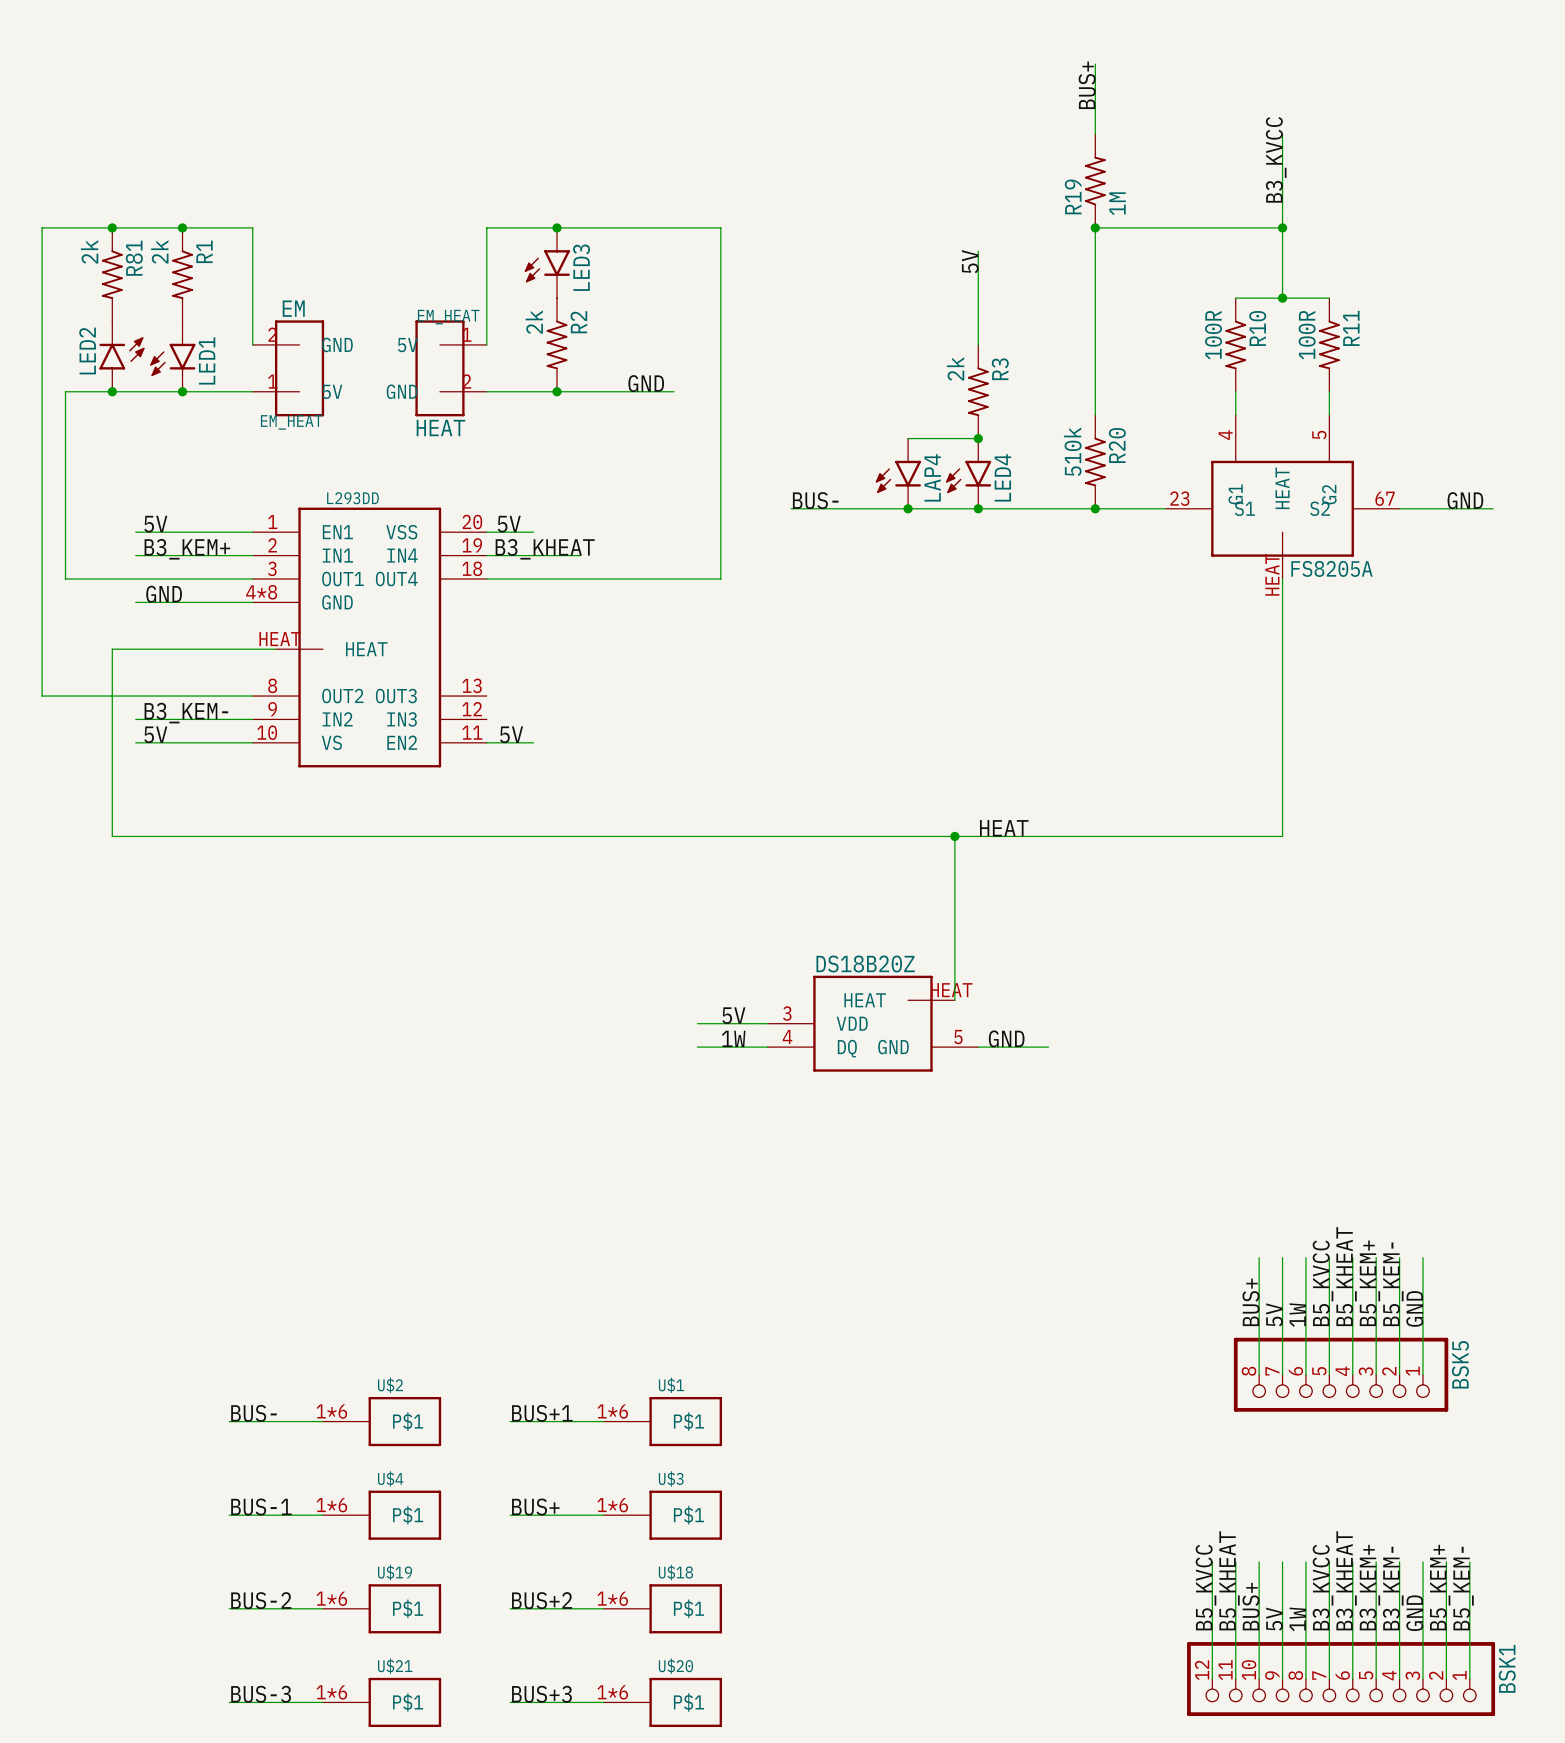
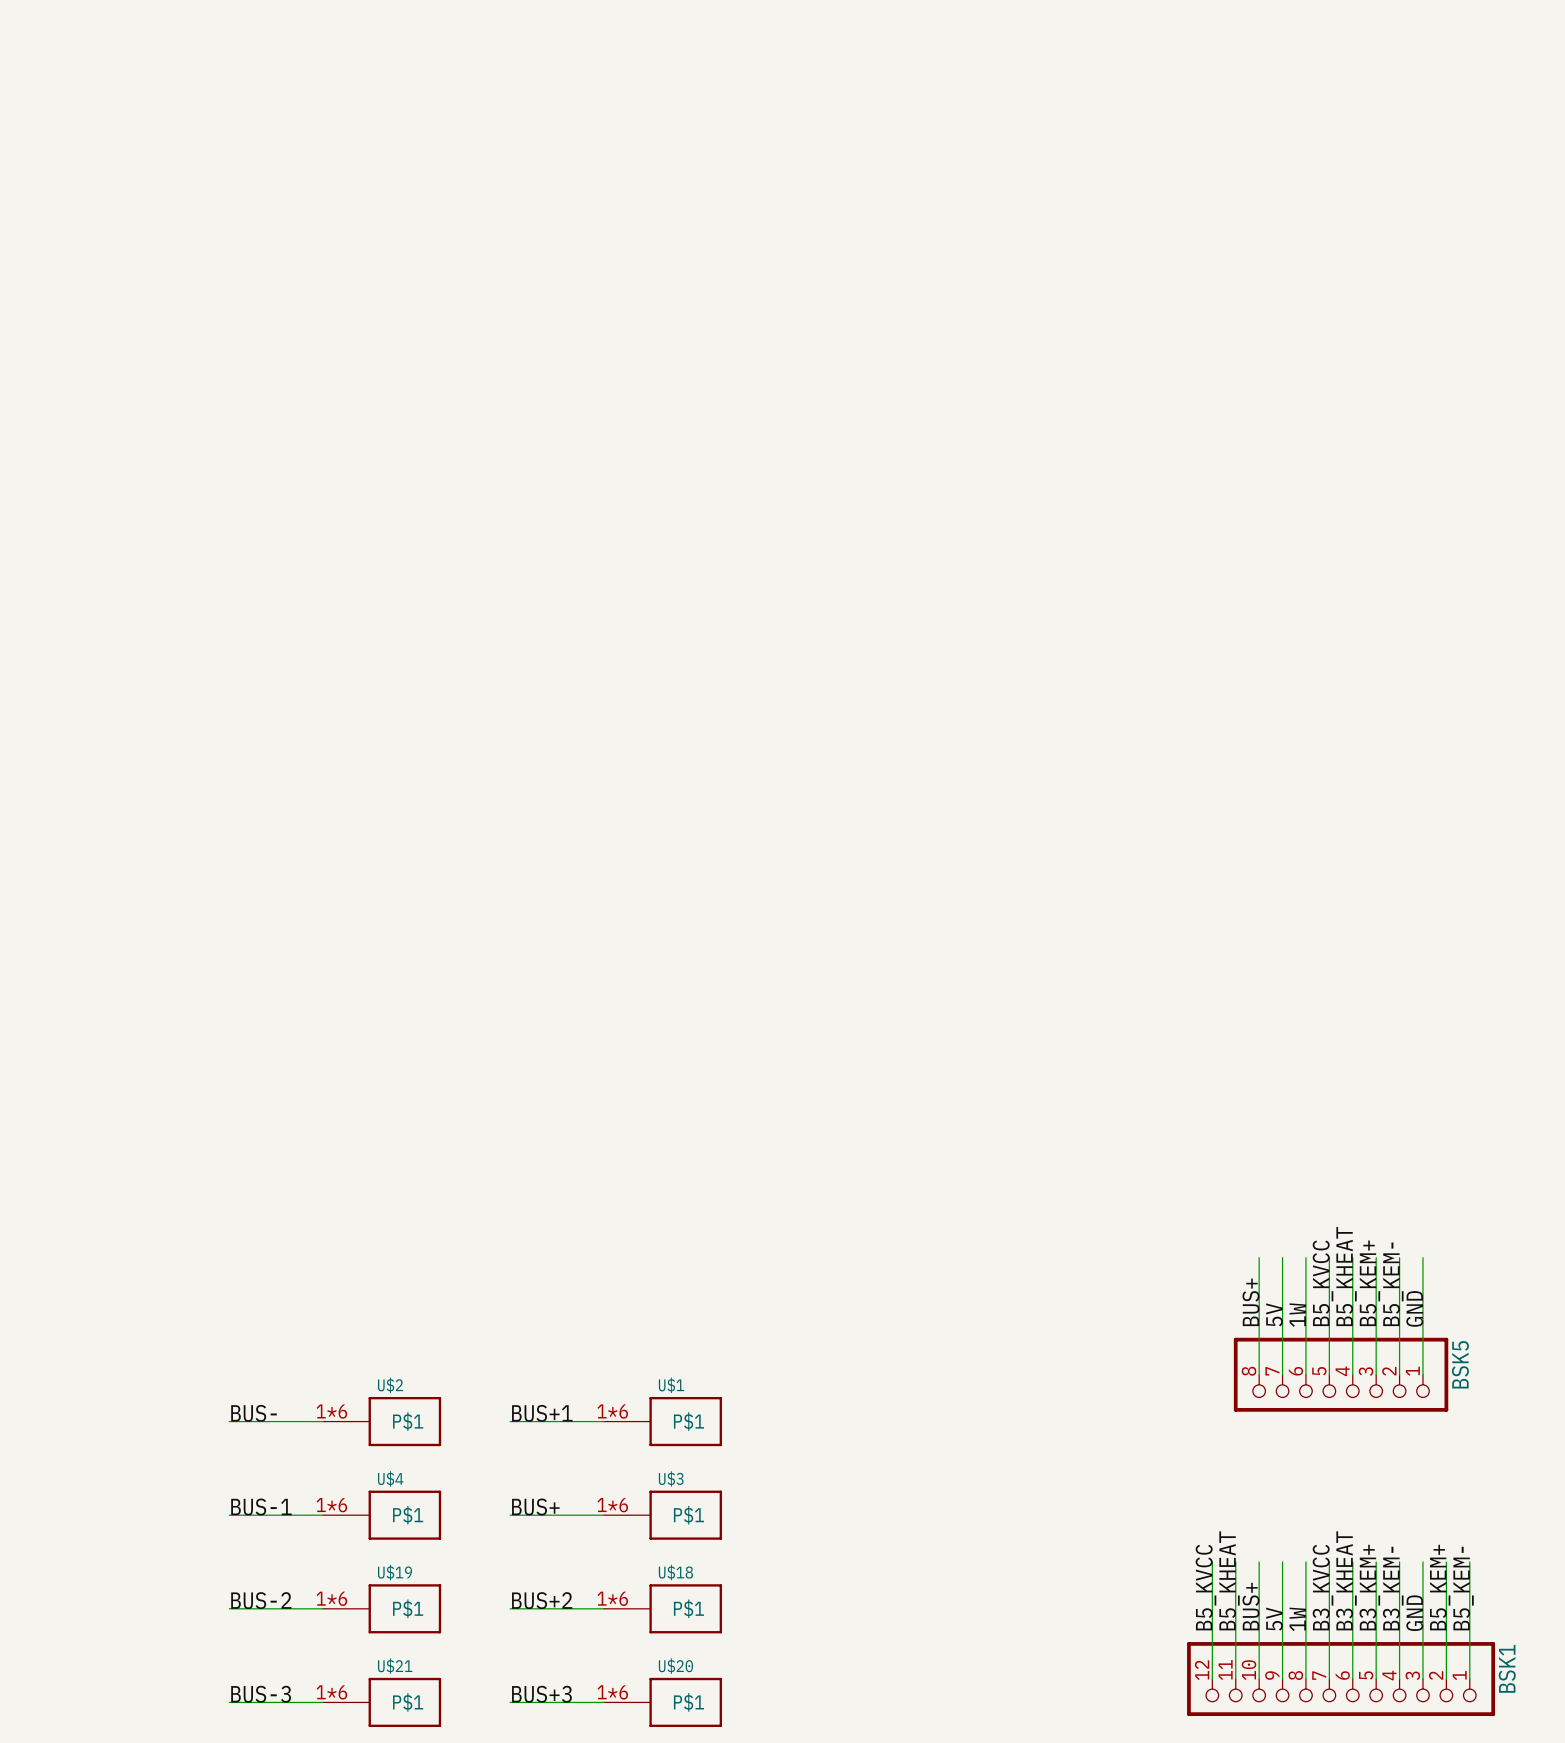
wire: (1095, 64) (1095, 134) -> none
label: BUS+ (1087, 85) -> none
wire: (1282, 134) (1282, 298) -> none
label: B3_KVCC (1276, 159) -> none
R19: 1M (1095, 181) -> none
junction: (112, 227) -> none
junction: (182, 227) -> none
junction: (557, 227) -> none
junction: (1095, 227) -> none
wire: (1282, 227) (1095, 227) (1095, 415) -> none
junction: (1282, 227) -> none
wire: (978, 251) (978, 344) -> none
label: 5V (970, 261) -> none
LED3: (547, 263) -> none
R81: 2k (112, 274) -> none
R1: 2k (182, 274) -> none
wire: (1235, 298) (1329, 298) -> none
junction: (1282, 298) -> none
text: EM (293, 308) -> none
wire: (252, 344) (252, 227) (42, 227) (42, 696) (252, 696) -> none
wire: (486, 344) (486, 227) (720, 227) (720, 579) (486, 579) -> none
R2: 2k (557, 344) -> none
R10: 100R (1235, 344) -> none
R11: 100R (1329, 344) -> none
LED2: (122, 356) -> none
LED1: (172, 356) -> none
part: (288, 368) -> none
part: (451, 368) -> none
label: GND (646, 383) -> none
junction: (112, 391) -> none
junction: (182, 391) -> none
wire: (252, 391) (65, 391) (65, 579) (252, 579) -> none
wire: (486, 391) (674, 391) -> none
junction: (557, 391) -> none
R3: 2k (978, 391) -> none
wire: (1235, 391) (1235, 415) -> none
wire: (1329, 391) (1329, 415) -> none
text: HEAT (440, 428) -> none
wire: (908, 438) (978, 438) -> none
junction: (978, 438) -> none
R20: 510k (1095, 461) -> none
LAP4: (898, 473) -> none
LED4: (968, 473) -> none
part: (1282, 497) -> none
label: BUS- (815, 500) -> none
label: GND (1465, 500) -> none
wire: (791, 508) (1165, 508) -> none
junction: (908, 508) -> none
junction: (978, 508) -> none
junction: (1095, 508) -> none
wire: (1399, 508) (1493, 508) -> none
label: 5V (155, 524) -> none
label: 5V (509, 524) -> none
wire: (135, 532) (252, 532) -> none
wire: (486, 532) (533, 532) -> none
label: B3_KEM+ (187, 549) -> none
label: B3_KHEAT (545, 549) -> none
wire: (135, 555) (252, 555) -> none
wire: (486, 555) (580, 555) -> none
wire: (1282, 579) (1282, 836) (112, 836) (112, 649) (276, 649) -> none
label: GND (164, 594) -> none
wire: (135, 602) (252, 602) -> none
part: (369, 637) -> none
label: B3_KEM- (186, 713) -> none
wire: (135, 719) (252, 719) -> none
label: 5V (155, 734) -> none
label: 5V (511, 734) -> none
wire: (135, 742) (252, 742) -> none
wire: (486, 742) (533, 742) -> none
label: HEAT (1004, 828) -> none
wire: (954, 836) (954, 1000) -> none
junction: (954, 836) -> none
label: 5V (733, 1015) -> none
wire: (697, 1023) (767, 1023) -> none
part: (872, 1023) -> none
label: 1W (733, 1038) -> none
label: GND (1006, 1038) -> none
wire: (697, 1047) (767, 1047) -> none
wire: (978, 1047) (1048, 1047) -> none

